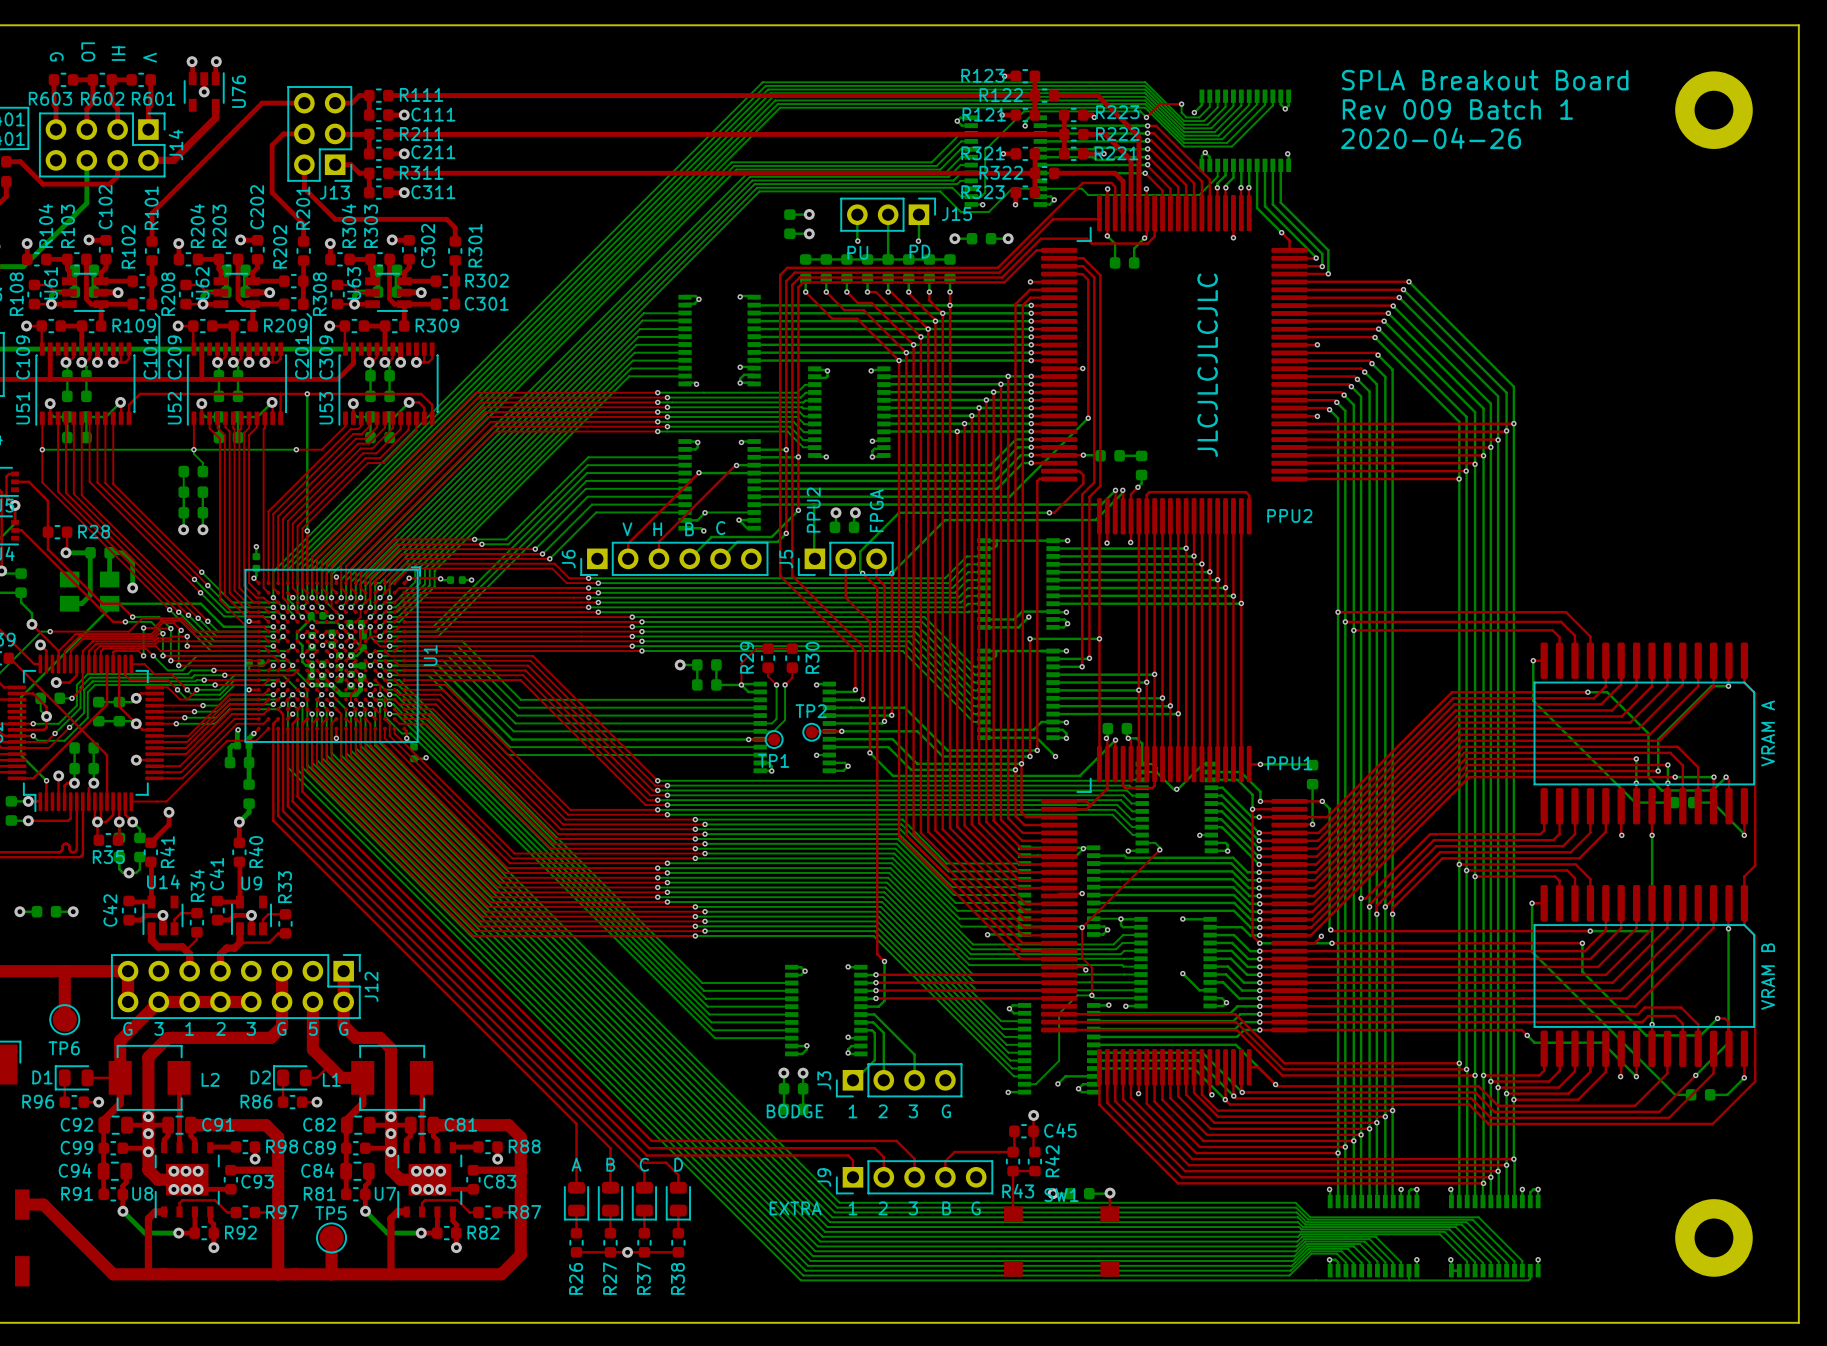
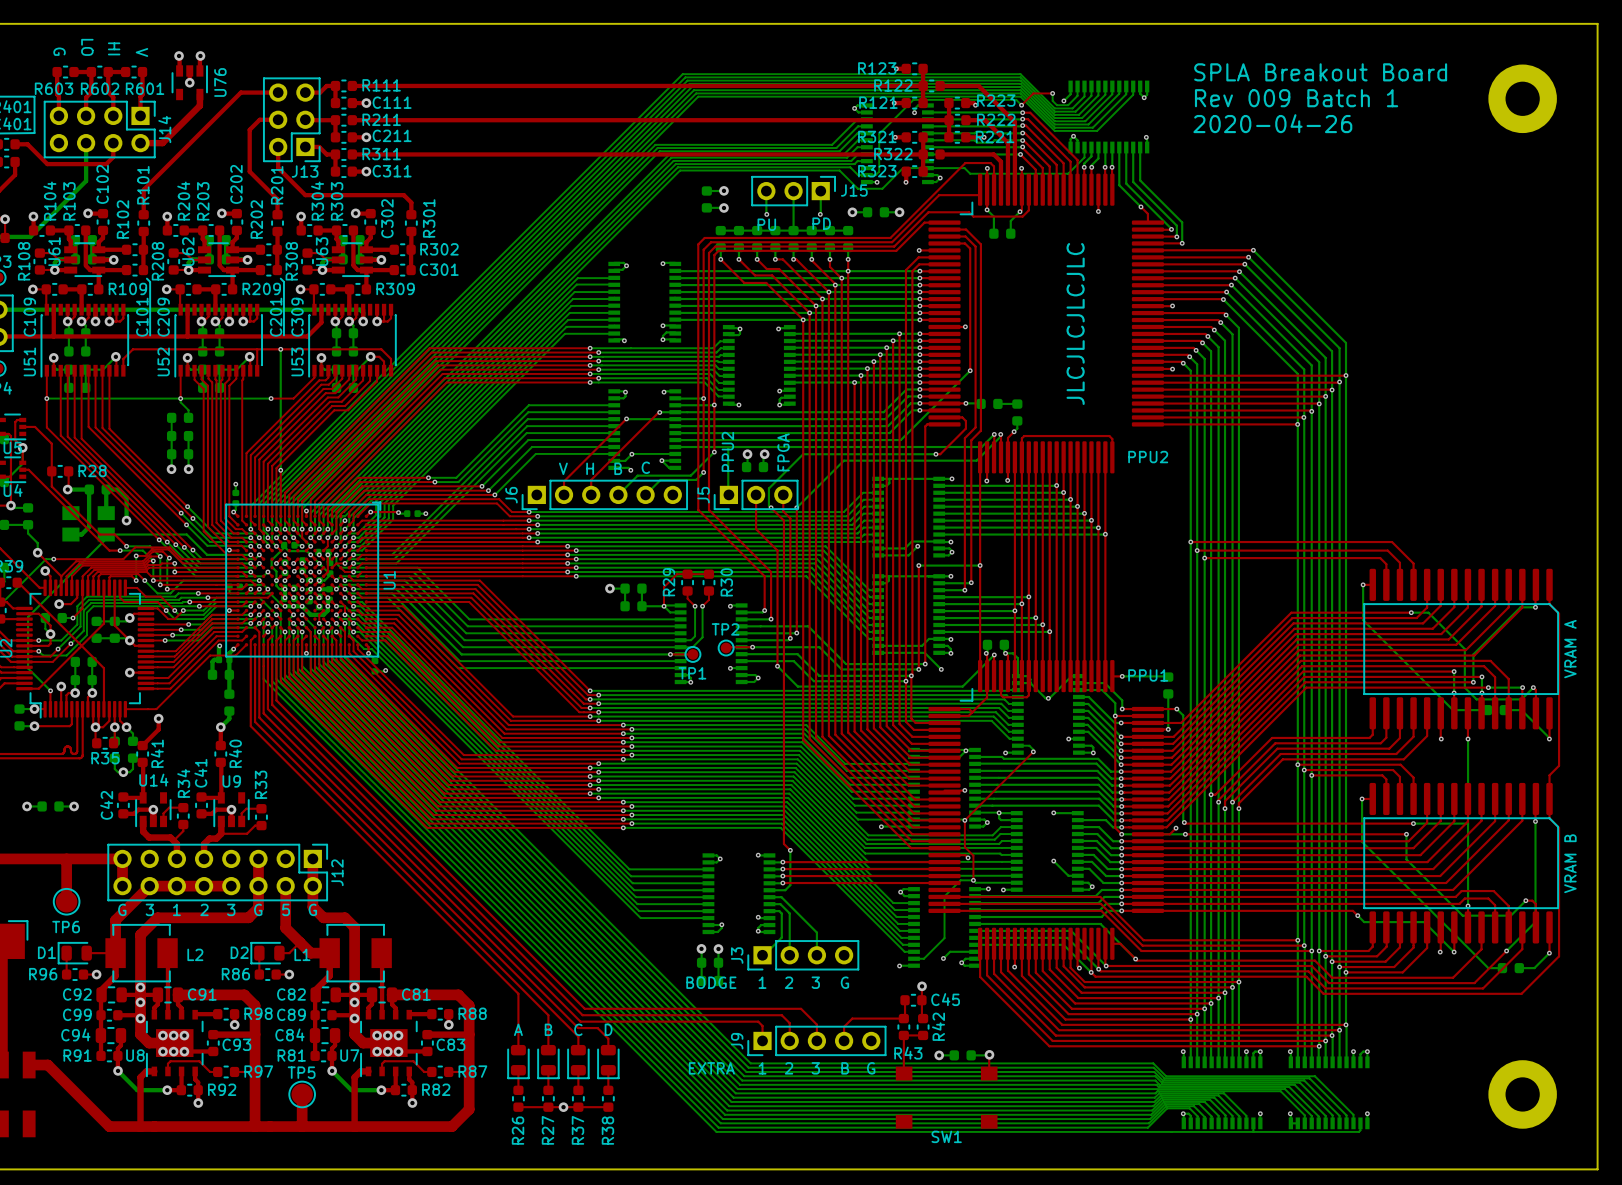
SW1 name position: SW1 (1061, 1195) -> SW1 (946, 1136)

